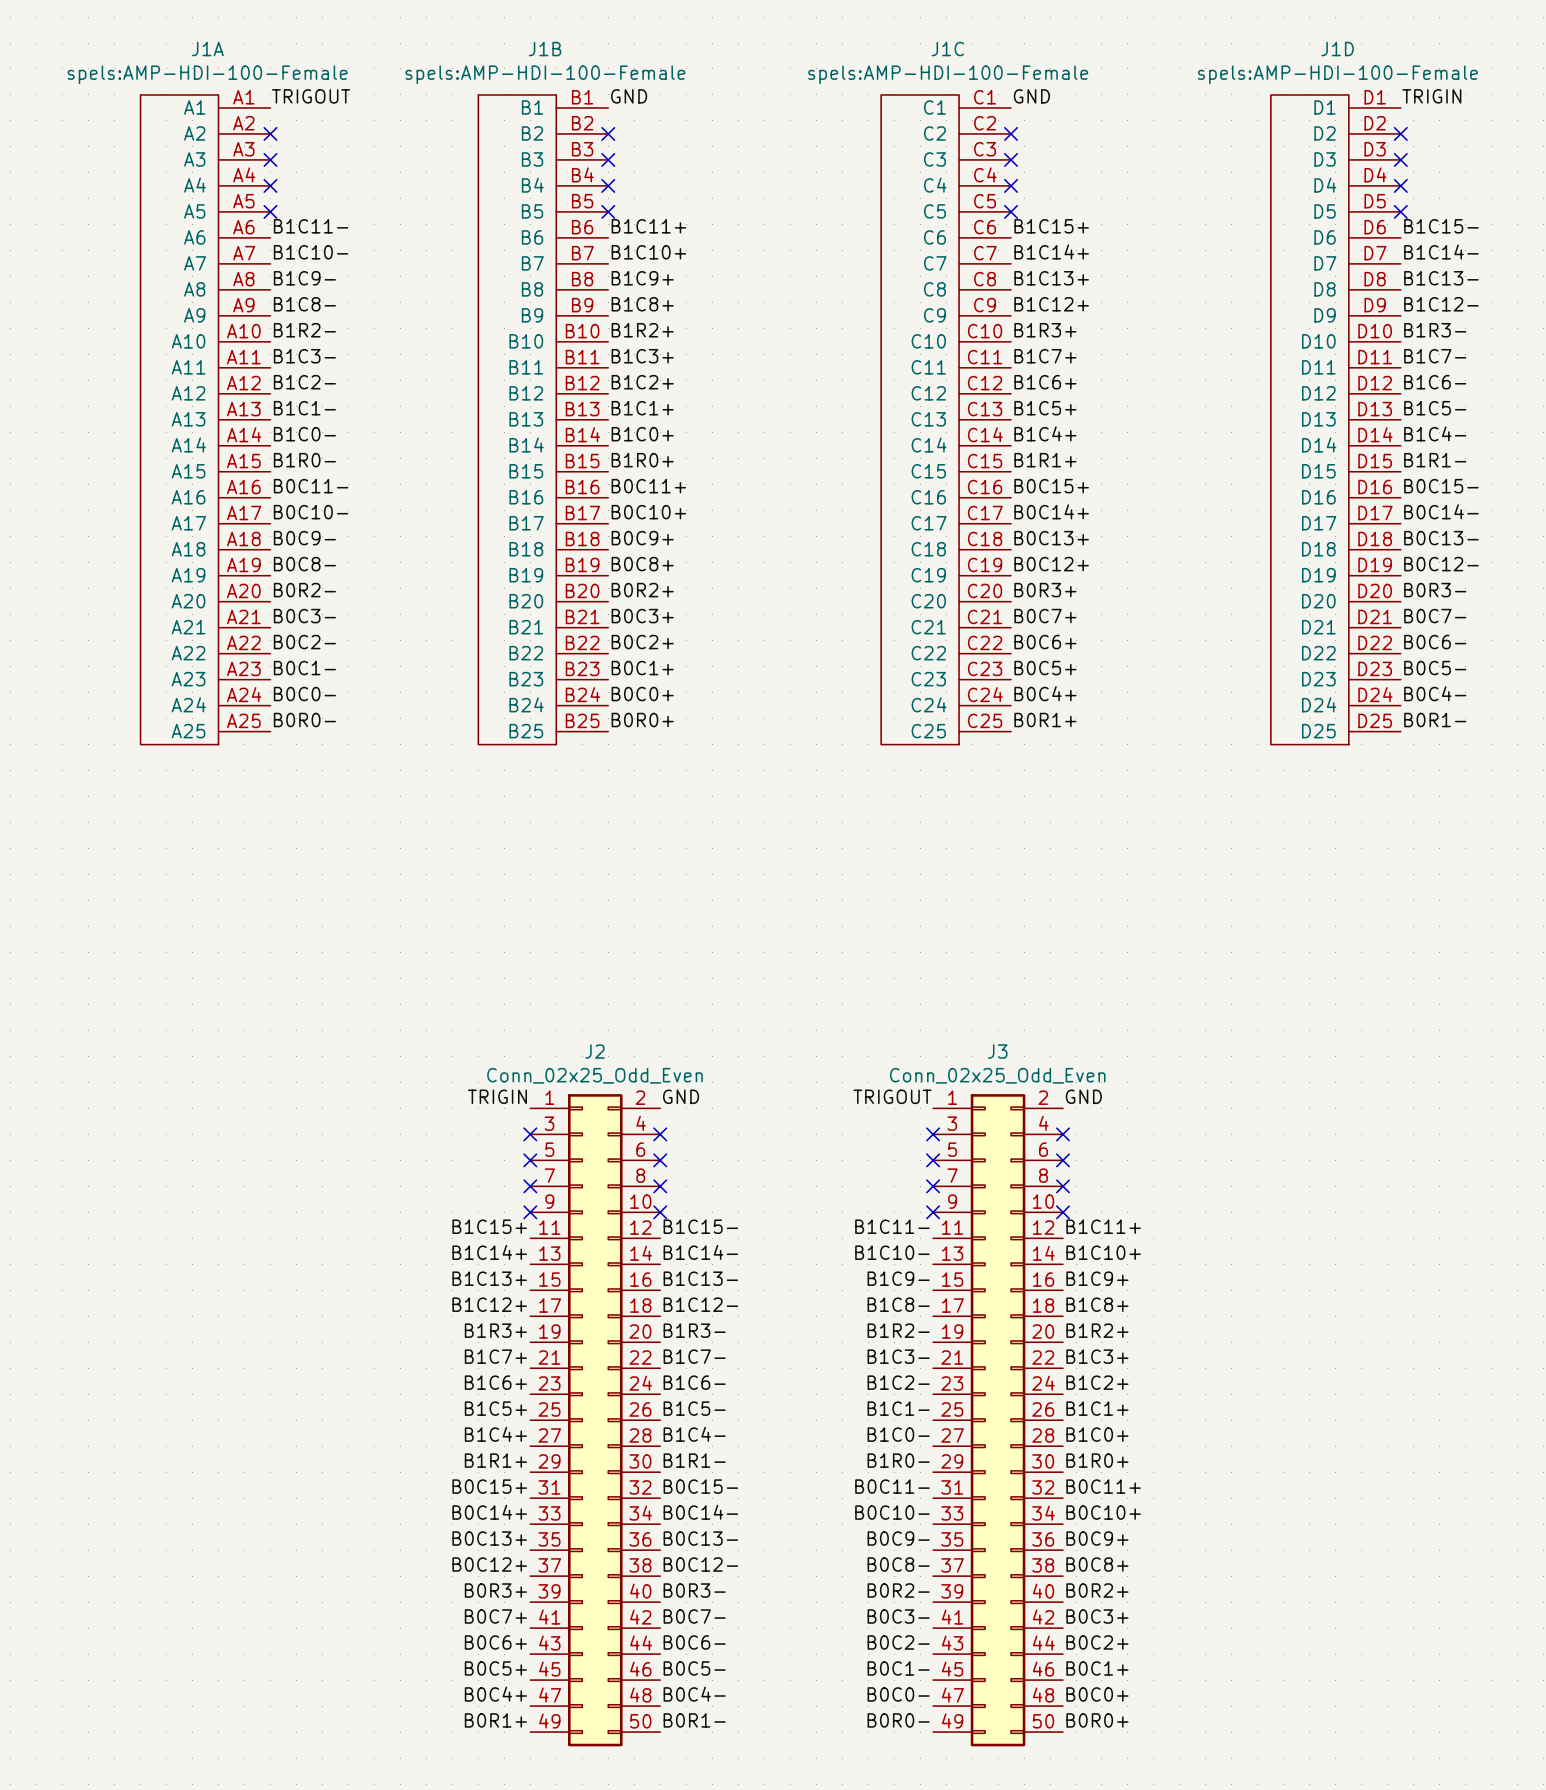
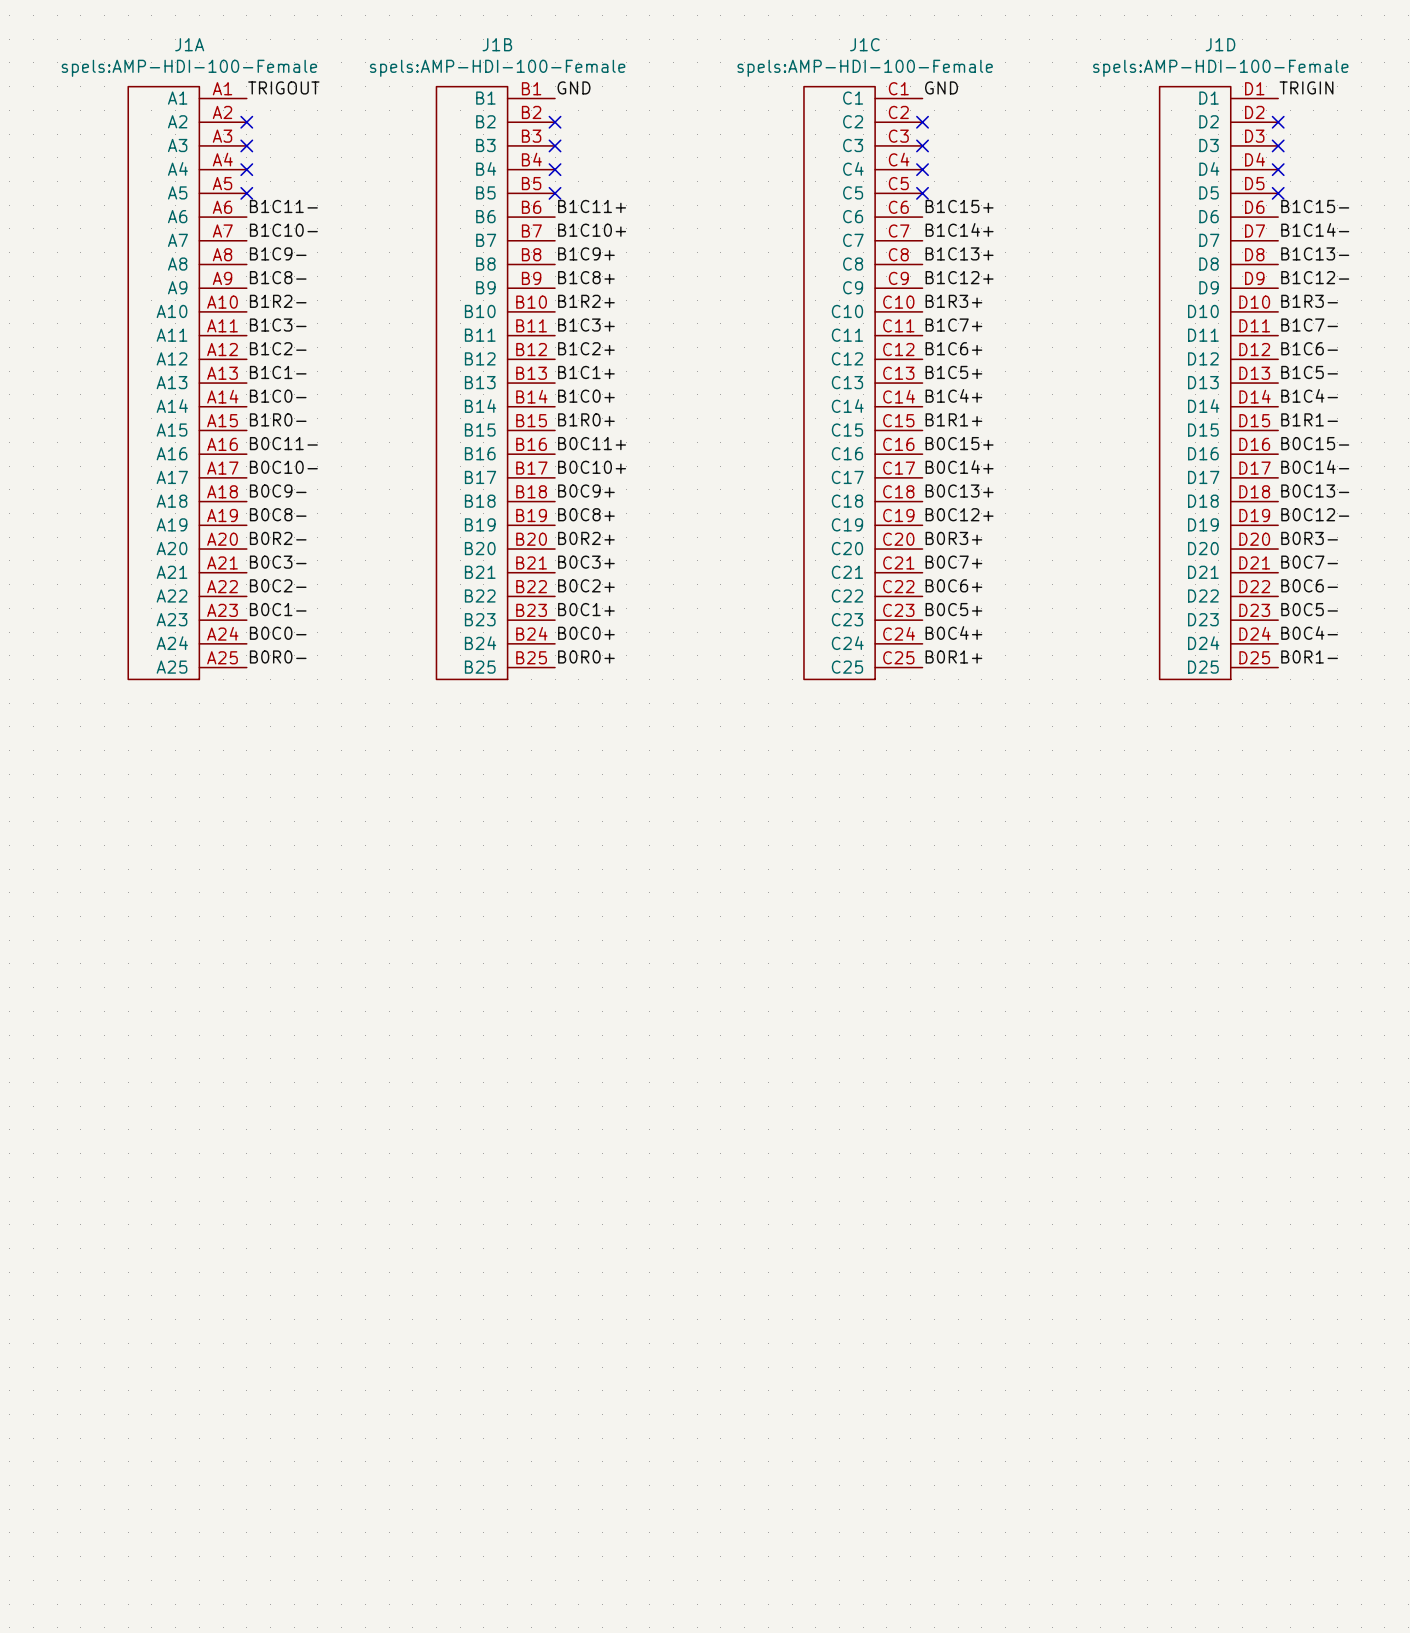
label: TRIGIN (497, 1096) -> none
label: GND (681, 1096) -> none
label: TRIGOUT (892, 1096) -> none
label: GND (1083, 1096) -> none
no-connect mark: (530, 1134) -> none
no-connect mark: (660, 1134) -> none
no-connect mark: (933, 1134) -> none
no-connect mark: (1063, 1134) -> none
no-connect mark: (530, 1160) -> none
no-connect mark: (660, 1160) -> none
no-connect mark: (933, 1160) -> none
no-connect mark: (1063, 1160) -> none
no-connect mark: (530, 1186) -> none
no-connect mark: (660, 1186) -> none
no-connect mark: (933, 1186) -> none
no-connect mark: (1063, 1186) -> none
no-connect mark: (530, 1212) -> none
no-connect mark: (660, 1212) -> none
no-connect mark: (933, 1212) -> none
no-connect mark: (1063, 1212) -> none
label: B1C15+ (489, 1226) -> none
label: B1C15- (700, 1226) -> none
label: B1C11- (892, 1226) -> none
label: B1C11+ (1103, 1226) -> none
label: B1C14+ (489, 1252) -> none
label: B1C14- (700, 1252) -> none
label: B1C10- (892, 1252) -> none
label: B1C10+ (1103, 1252) -> none
label: B1C13+ (489, 1278) -> none
label: B1C13- (700, 1278) -> none
label: B1C9- (898, 1278) -> none
label: B1C9+ (1097, 1278) -> none
label: B1C12+ (489, 1304) -> none
label: B1C12- (700, 1304) -> none
label: B1C8- (898, 1304) -> none
label: B1C8+ (1097, 1304) -> none
label: B1R3+ (495, 1330) -> none
label: B1R3- (694, 1330) -> none
label: B1R2- (898, 1330) -> none
label: B1R2+ (1097, 1330) -> none
label: B1C7+ (495, 1356) -> none
label: B1C7- (694, 1356) -> none
label: B1C3- (898, 1356) -> none
label: B1C3+ (1097, 1356) -> none
label: B1C6+ (495, 1382) -> none
label: B1C6- (694, 1382) -> none
label: B1C2- (898, 1382) -> none
label: B1C2+ (1097, 1382) -> none
label: B1C5+ (495, 1408) -> none
label: B1C5- (694, 1408) -> none
label: B1C1- (898, 1408) -> none
label: B1C1+ (1097, 1408) -> none
J2: Conn_02x25_Odd_Even (595, 1420) -> none
J3: Conn_02x25_Odd_Even (998, 1420) -> none
label: B1C4+ (495, 1434) -> none
label: B1C4- (694, 1434) -> none
label: B1C0- (898, 1434) -> none
label: B1C0+ (1097, 1434) -> none
label: B1R1+ (495, 1460) -> none
label: B1R1- (694, 1460) -> none
label: B1R0- (898, 1460) -> none
label: B1R0+ (1097, 1460) -> none
label: B0C15+ (489, 1486) -> none
label: B0C15- (700, 1486) -> none
label: B0C11- (892, 1486) -> none
label: B0C11+ (1103, 1486) -> none
label: B0C14+ (489, 1512) -> none
label: B0C14- (700, 1512) -> none
label: B0C10- (892, 1512) -> none
label: B0C10+ (1103, 1512) -> none
label: B0C13+ (489, 1538) -> none
label: B0C13- (700, 1538) -> none
label: B0C9- (898, 1538) -> none
label: B0C9+ (1097, 1538) -> none
label: B0C12+ (489, 1564) -> none
label: B0C12- (700, 1564) -> none
label: B0C8- (898, 1564) -> none
label: B0C8+ (1097, 1564) -> none
label: B0R3+ (495, 1590) -> none
label: B0R3- (694, 1590) -> none
label: B0R2- (898, 1590) -> none
label: B0R2+ (1097, 1590) -> none
label: B0C7+ (495, 1616) -> none
label: B0C7- (694, 1616) -> none
label: B0C3- (898, 1616) -> none
label: B0C3+ (1097, 1616) -> none
label: B0C6+ (495, 1642) -> none
label: B0C6- (694, 1642) -> none
label: B0C2- (898, 1642) -> none
label: B0C2+ (1097, 1642) -> none
label: B0C5+ (495, 1668) -> none
label: B0C5- (694, 1668) -> none
label: B0C1- (898, 1668) -> none
label: B0C1+ (1097, 1668) -> none
label: B0C4+ (495, 1694) -> none
label: B0C4- (694, 1694) -> none
label: B0C0- (898, 1694) -> none
label: B0C0+ (1097, 1694) -> none
label: B0R1+ (495, 1720) -> none
label: B0R1- (694, 1720) -> none
label: B0R0- (898, 1720) -> none
label: B0R0+ (1097, 1720) -> none

